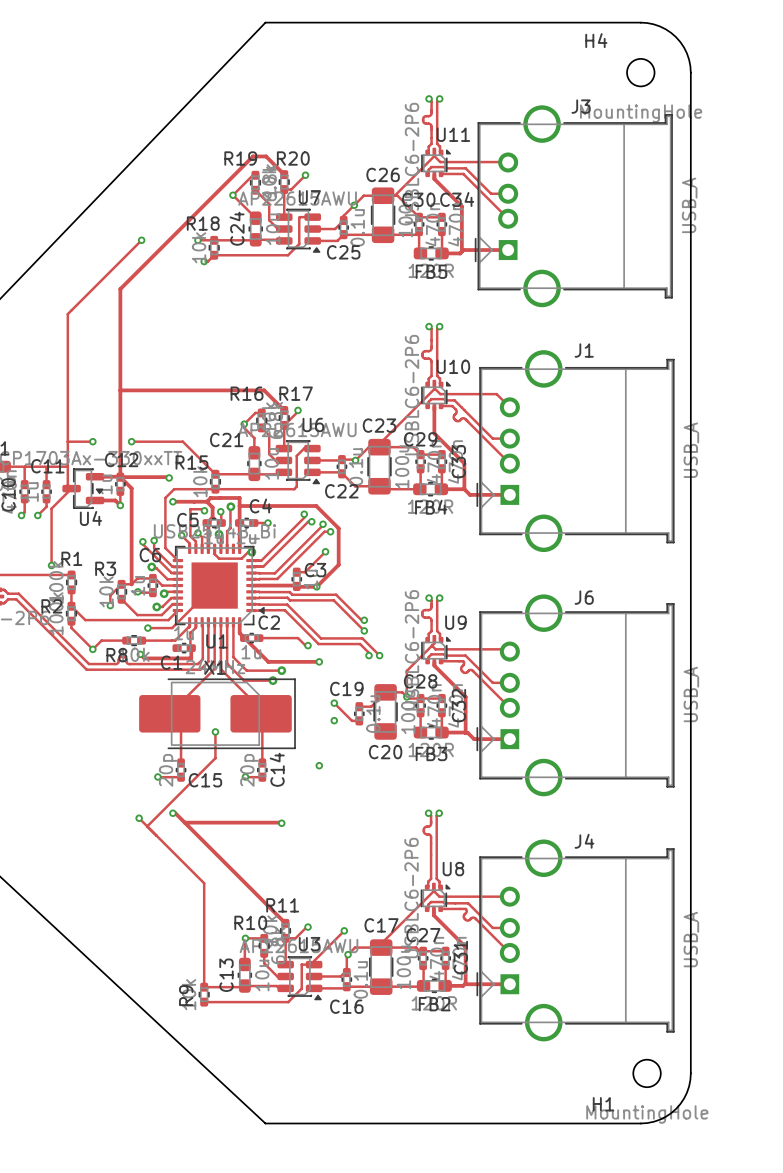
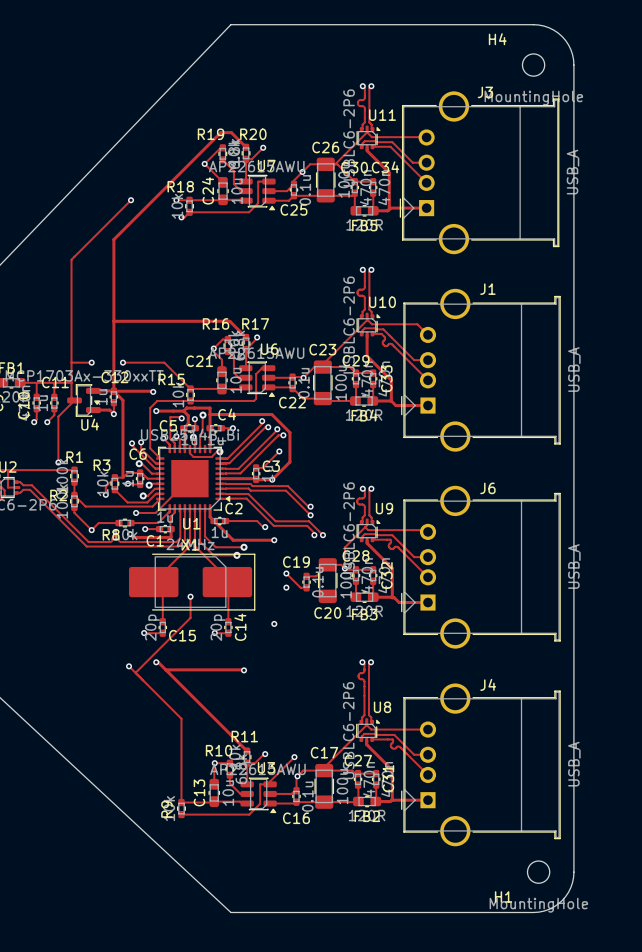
track: none -> (145, 529) (159, 529)
via: none -> (145, 529)

